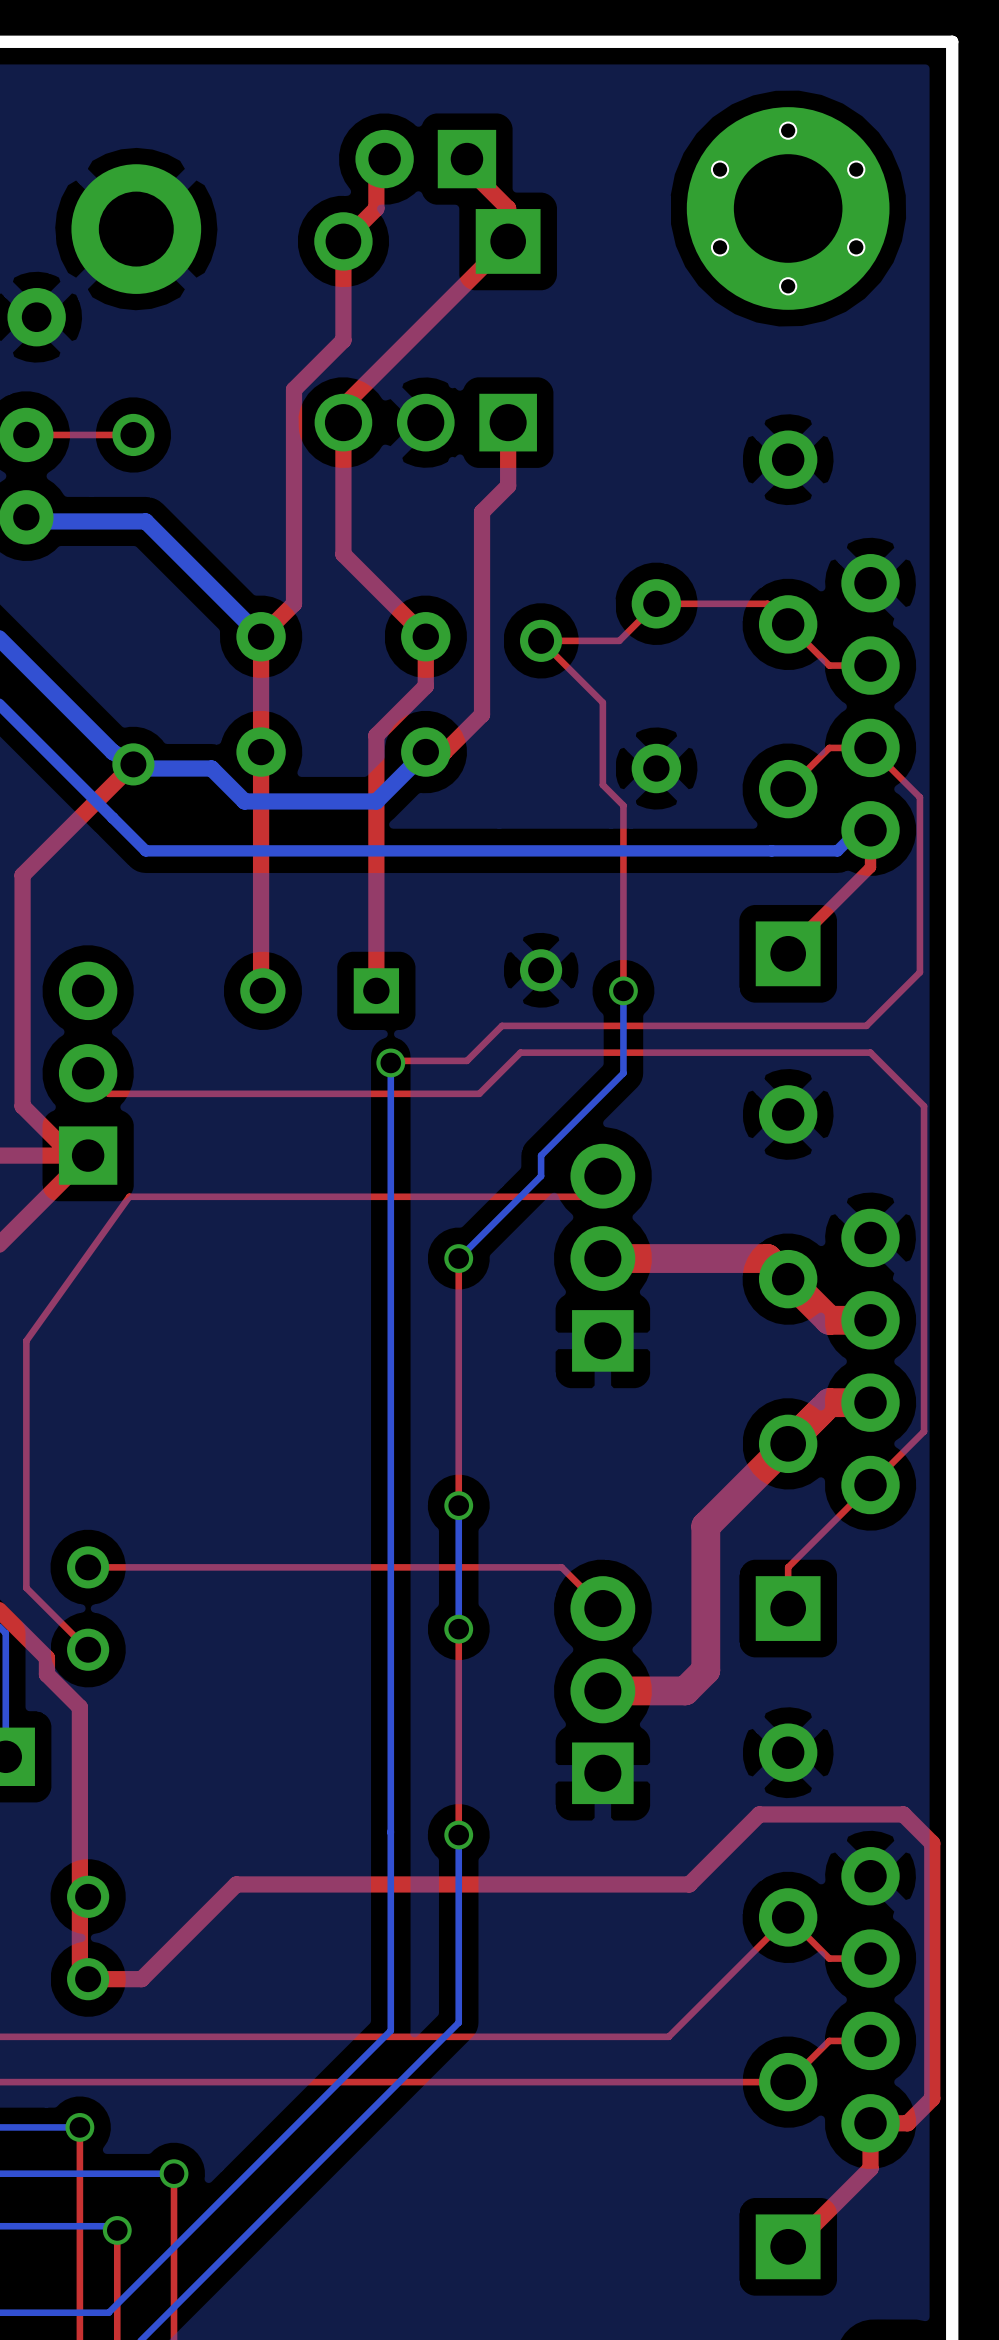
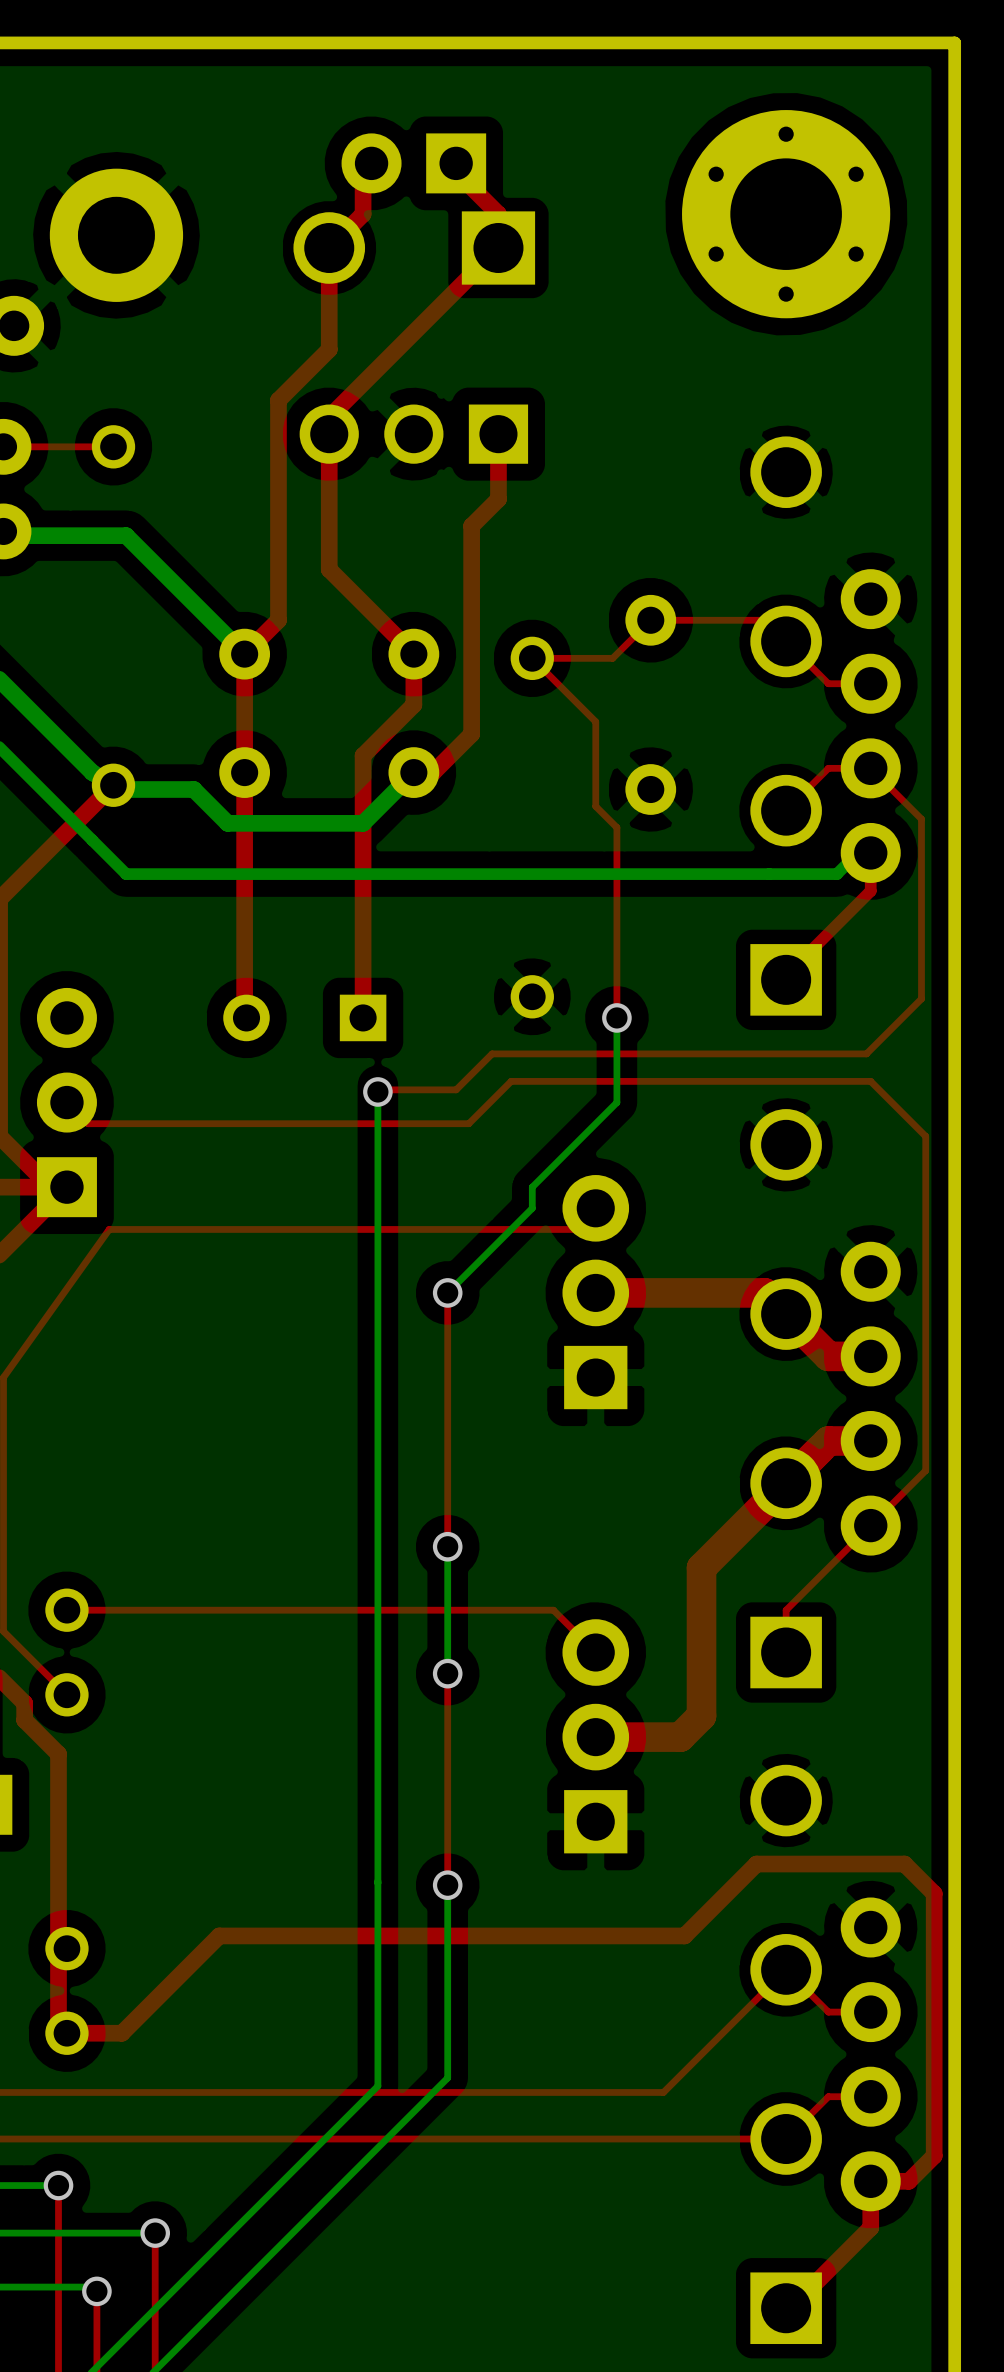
part footprint: [314, 129, 541, 274] -> [293, 133, 536, 285]
part footprint: [755, 430, 900, 987] -> [750, 436, 901, 1016]
part footprint: [755, 1085, 900, 1641] -> [750, 1109, 901, 1689]
part footprint: [755, 1723, 900, 2280] -> [750, 1764, 901, 2345]

